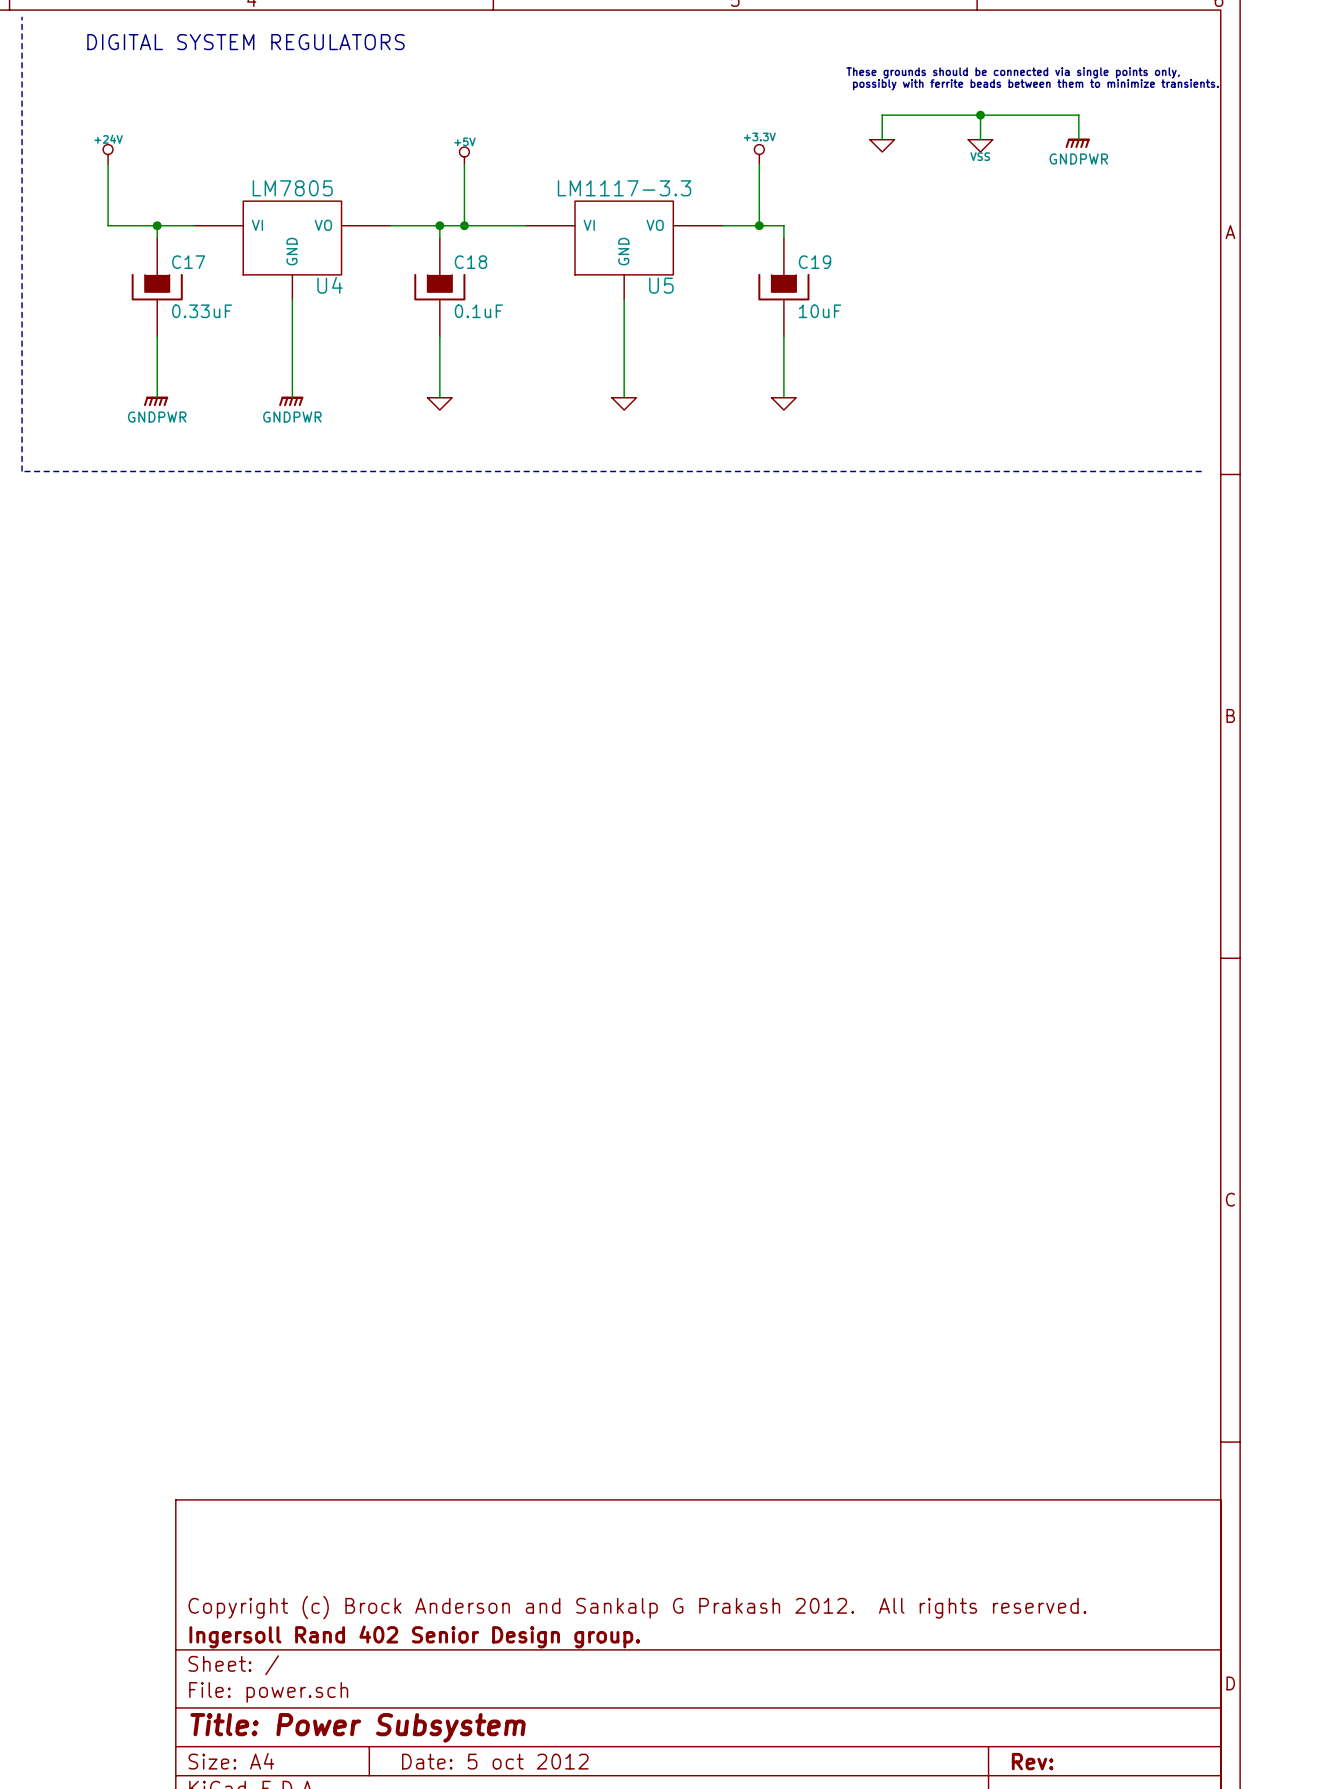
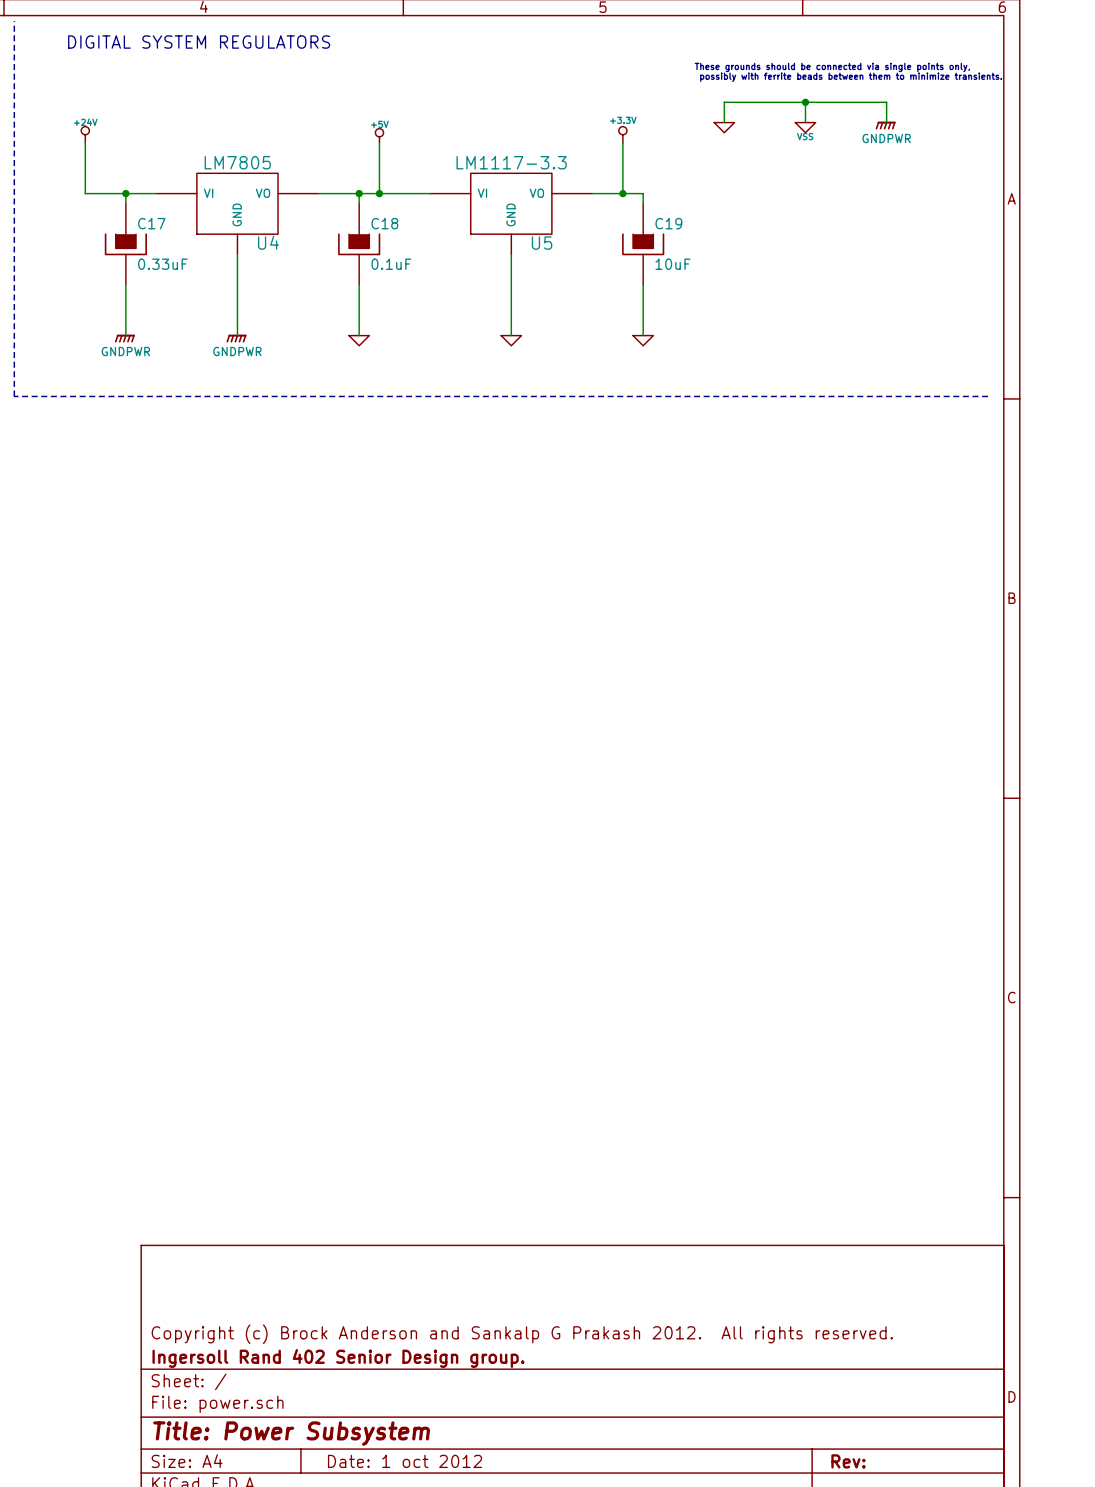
title block: Date: 5 oct 2012 (495, 1761) -> Date: 1 oct 2012 (405, 1461)

